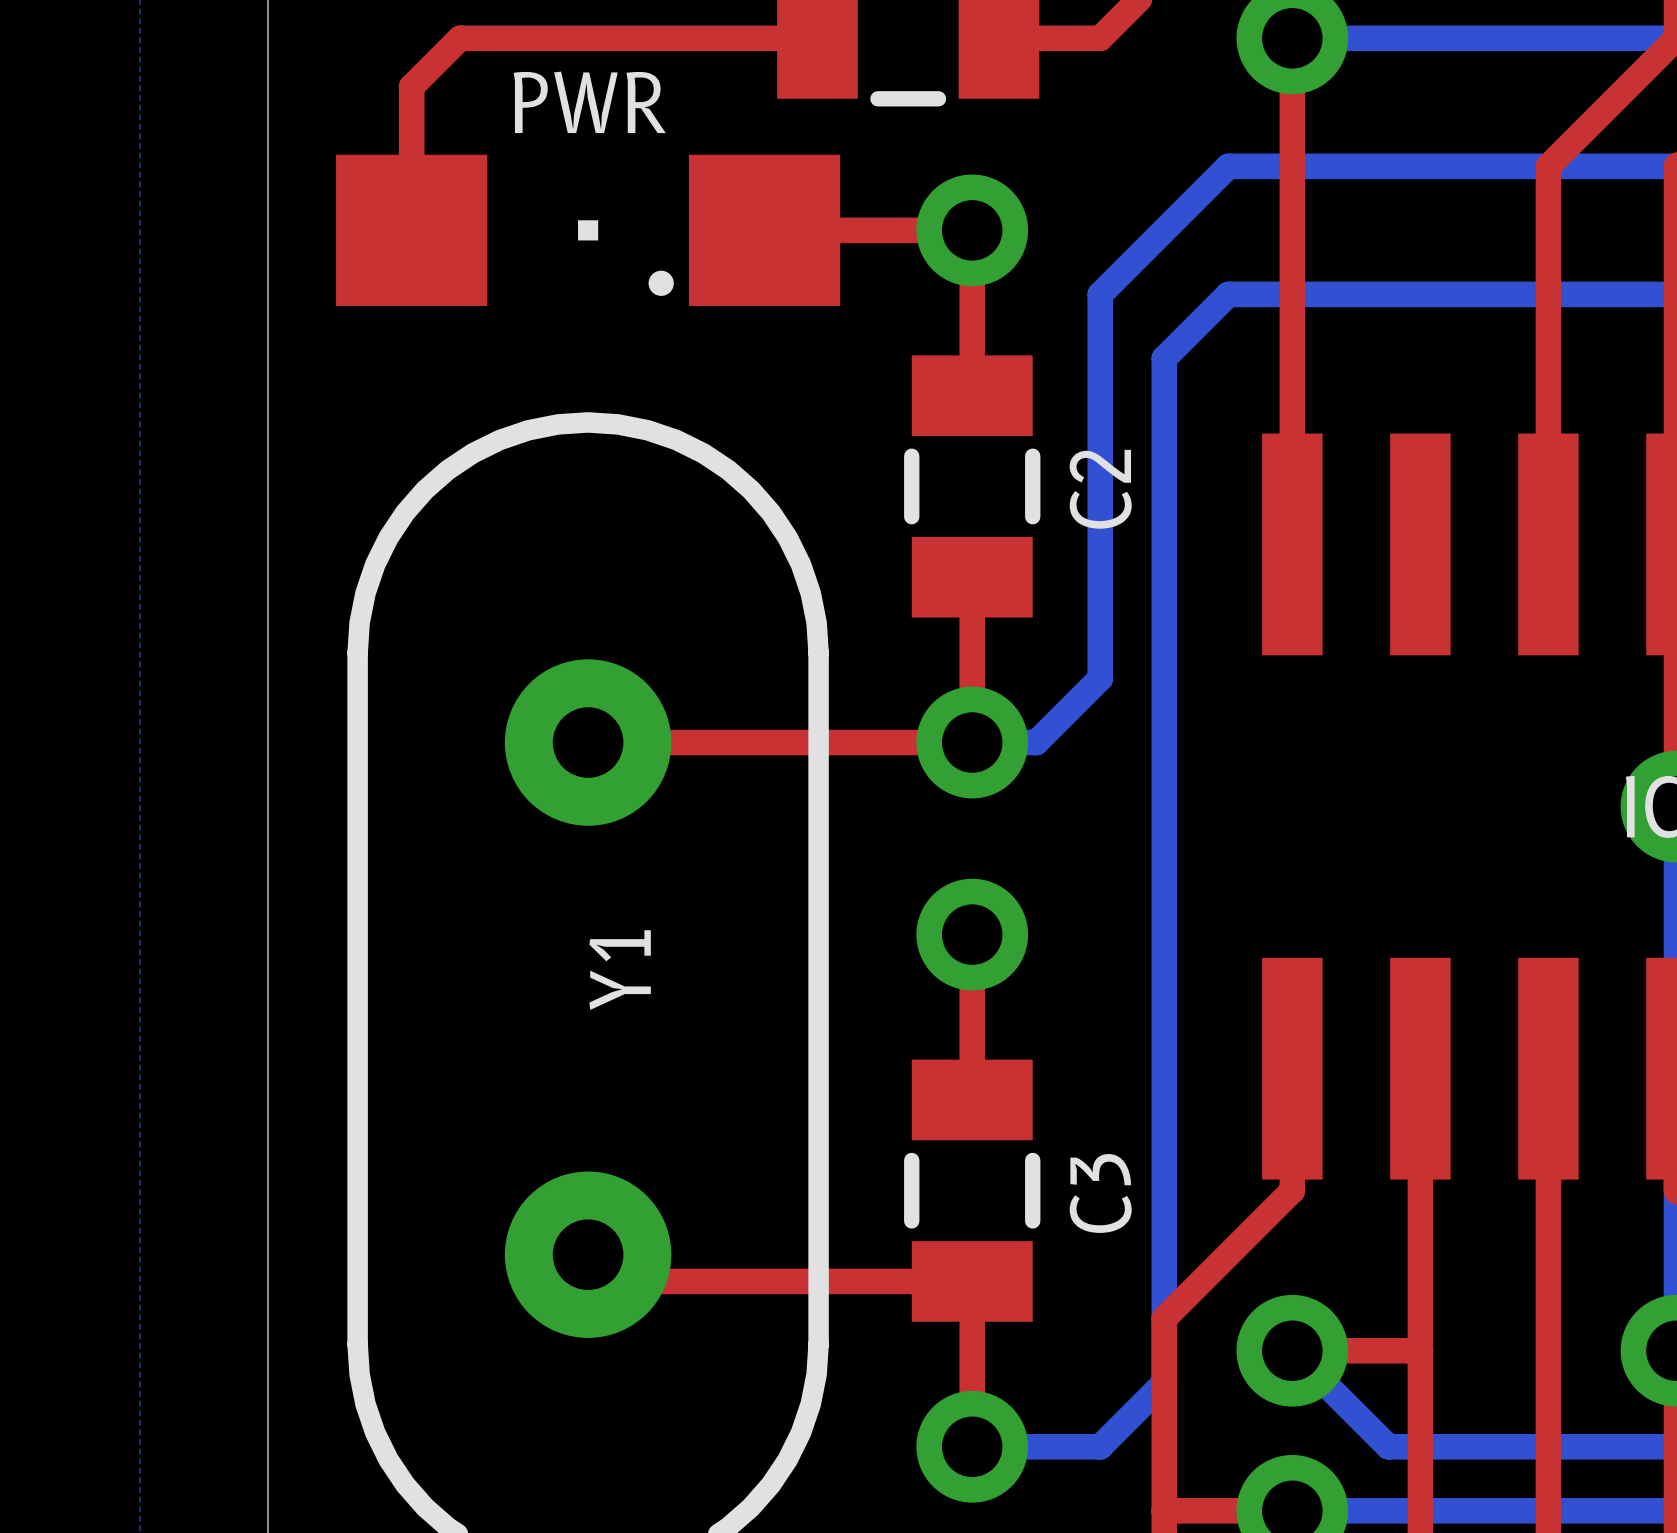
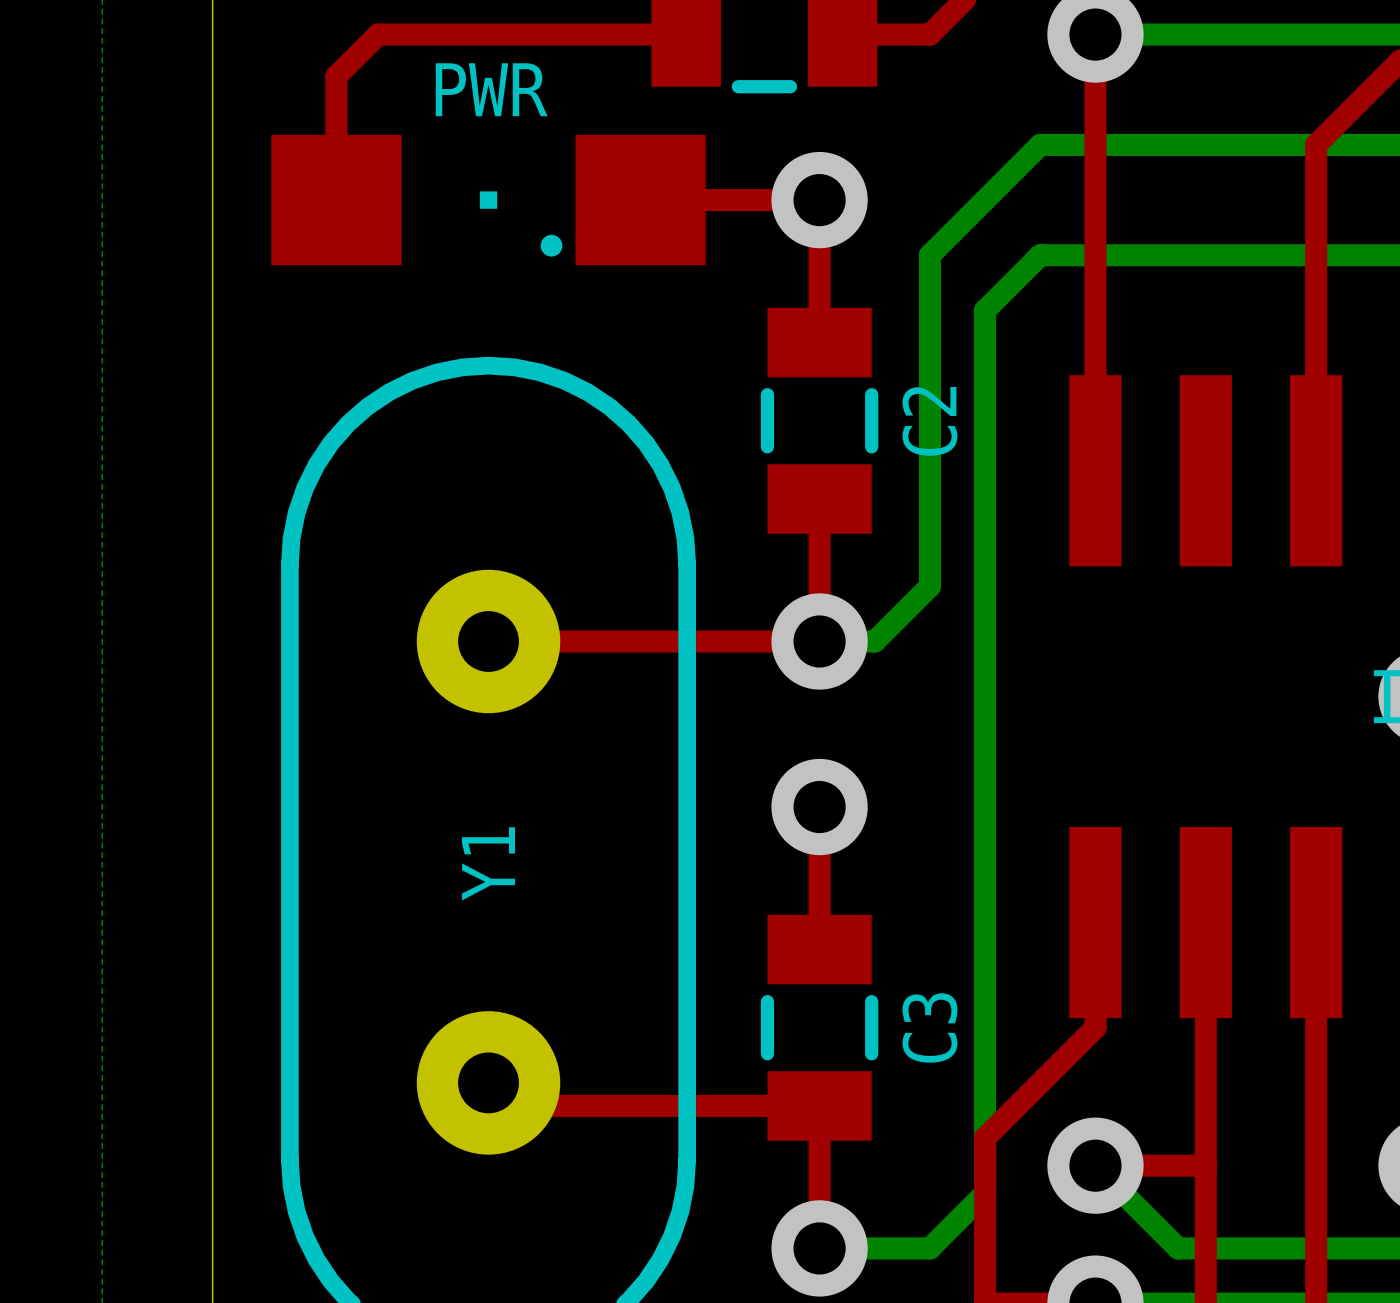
Y1 name position: Y1 (620, 970) -> Y1 (488, 863)

